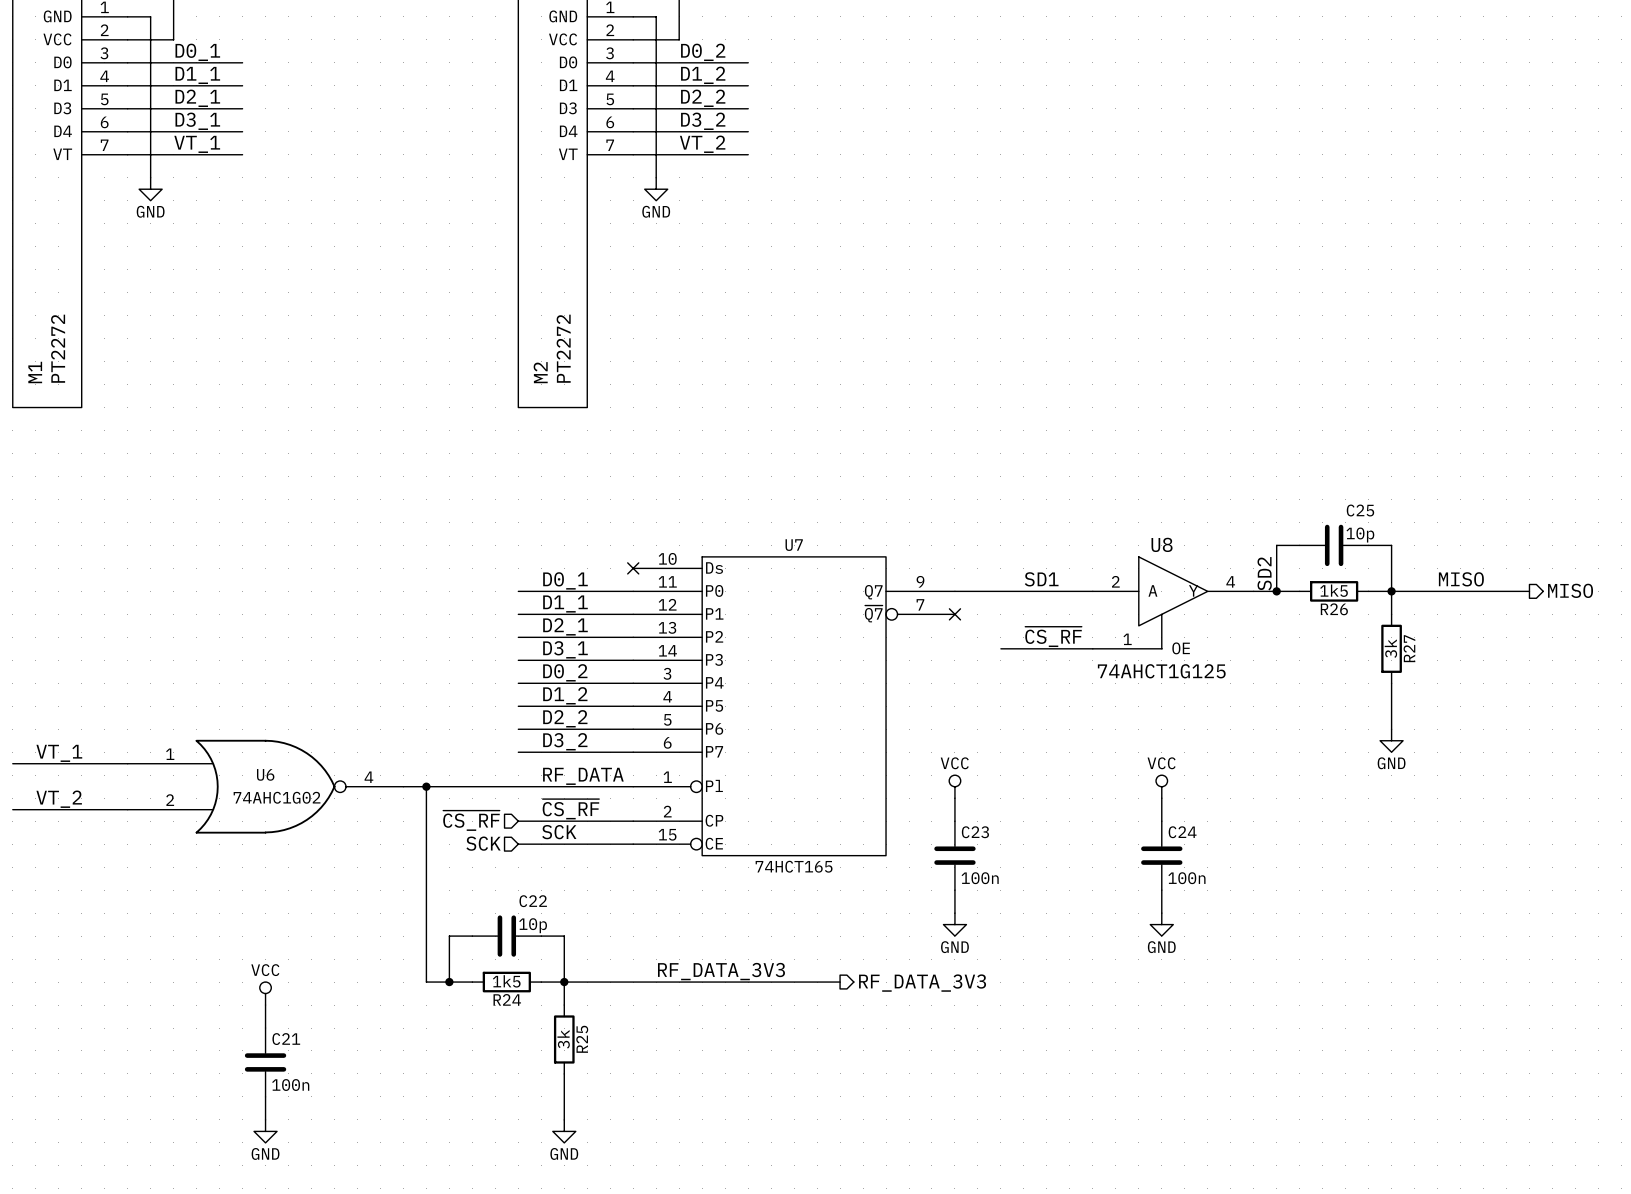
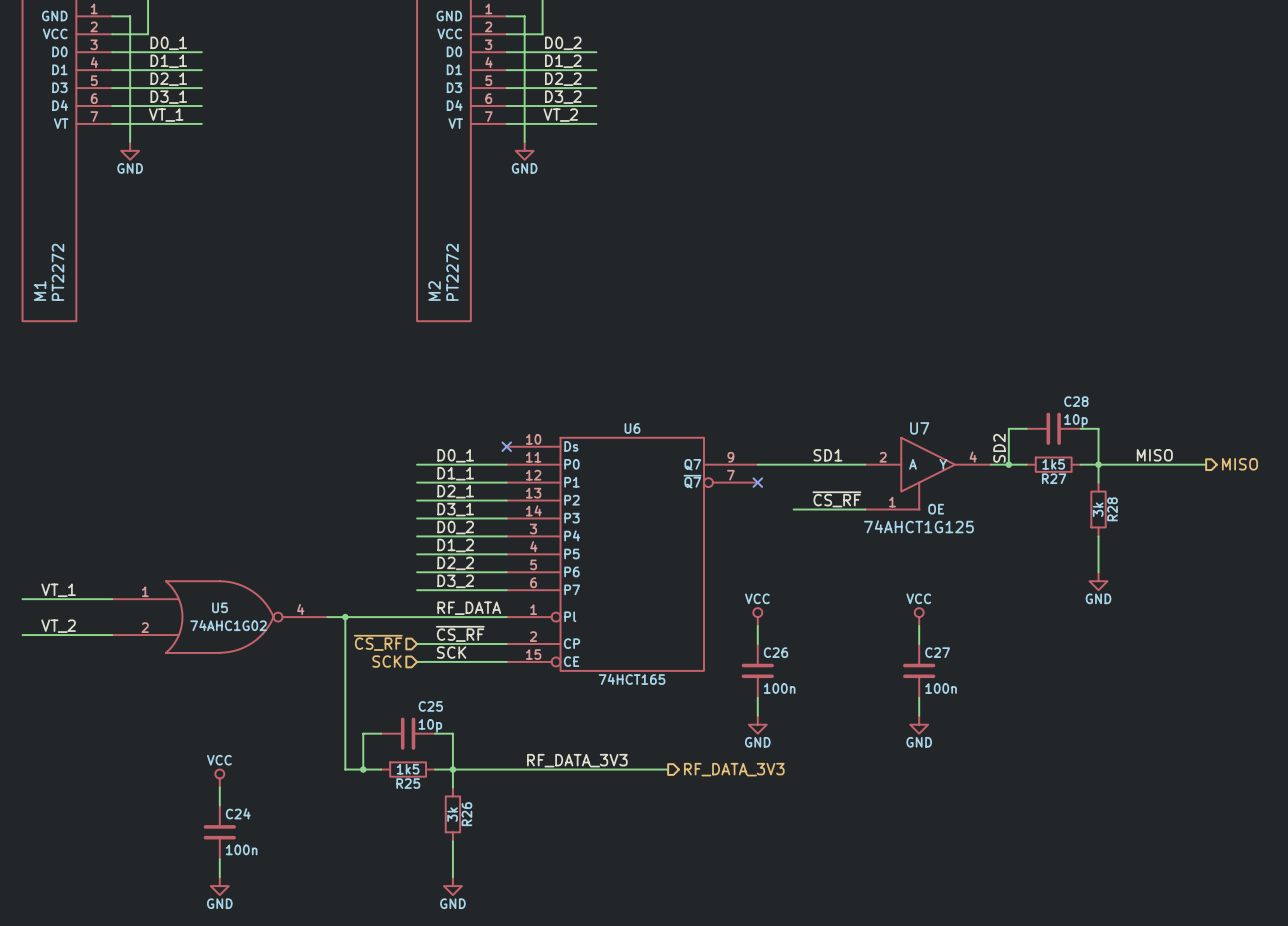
C25 name: C25 (1360, 510) -> C28 (1076, 401)
U8 name: U8 (1162, 544) -> U7 (919, 428)
U7 name: U7 (794, 545) -> U6 (632, 428)
R26 name: R26 (1334, 609) -> R27 (1054, 478)
R27 name: R27 (1409, 648) -> R28 (1112, 509)
U6 name: U6 (265, 774) -> U5 (220, 607)
C23 name: C23 (975, 832) -> C26 (776, 652)
C24 name: C24 (1182, 832) -> C27 (937, 652)
C22 name: C22 (533, 901) -> C25 (430, 706)
R24 name: R24 (507, 999) -> R25 (408, 783)
C21 name: C21 (286, 1039) -> C24 (238, 813)
R25 name: R25 (582, 1039) -> R26 (466, 814)

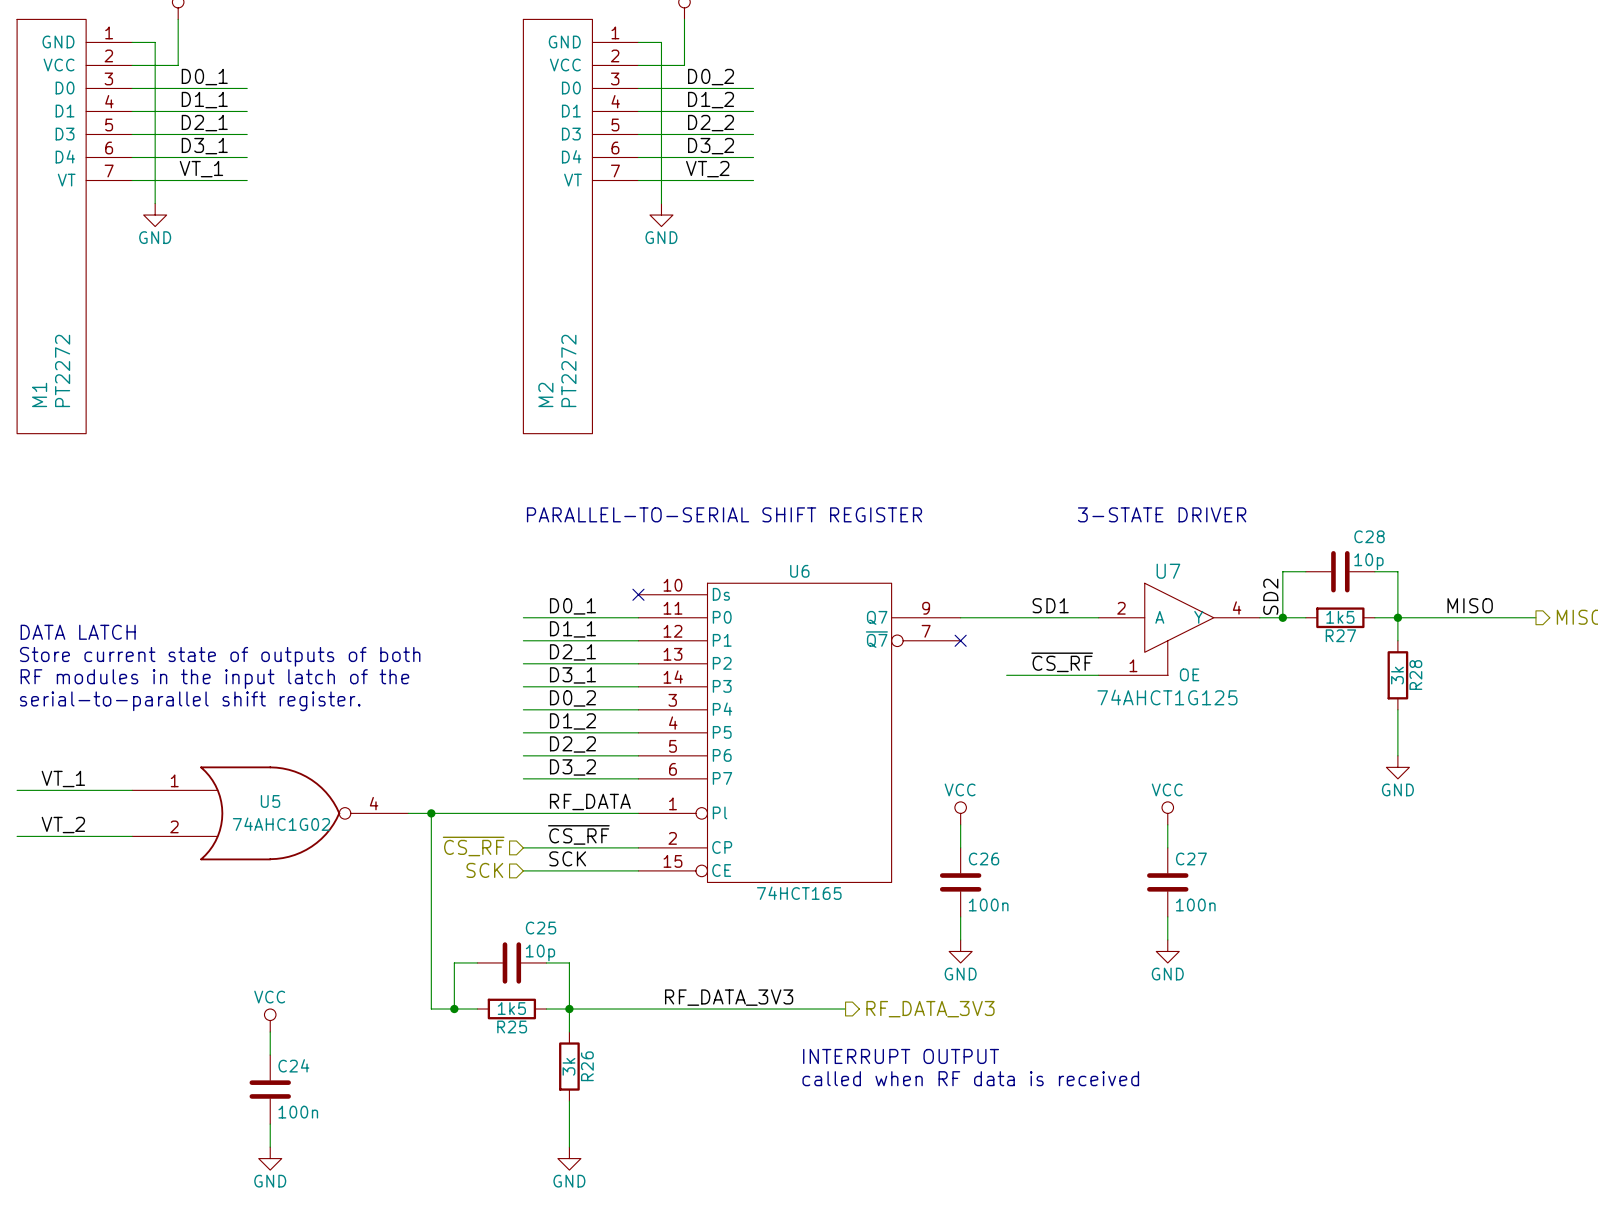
text: none -> PARALLEL-TO-SERIAL SHIFT REGISTER (724, 514)
text: none -> 3-STATE DRIVER (1162, 514)
text: none -> DATA LATCH (78, 632)
text: none -> Store current state of outputs of both (220, 656)
text: none -> RF modules in the input latch of the (214, 679)
text: none -> serial-to-parallel shift register. (190, 701)
text: none -> INTERRUPT OUTPUT (901, 1056)
text: none -> called when RF data is received (970, 1078)

